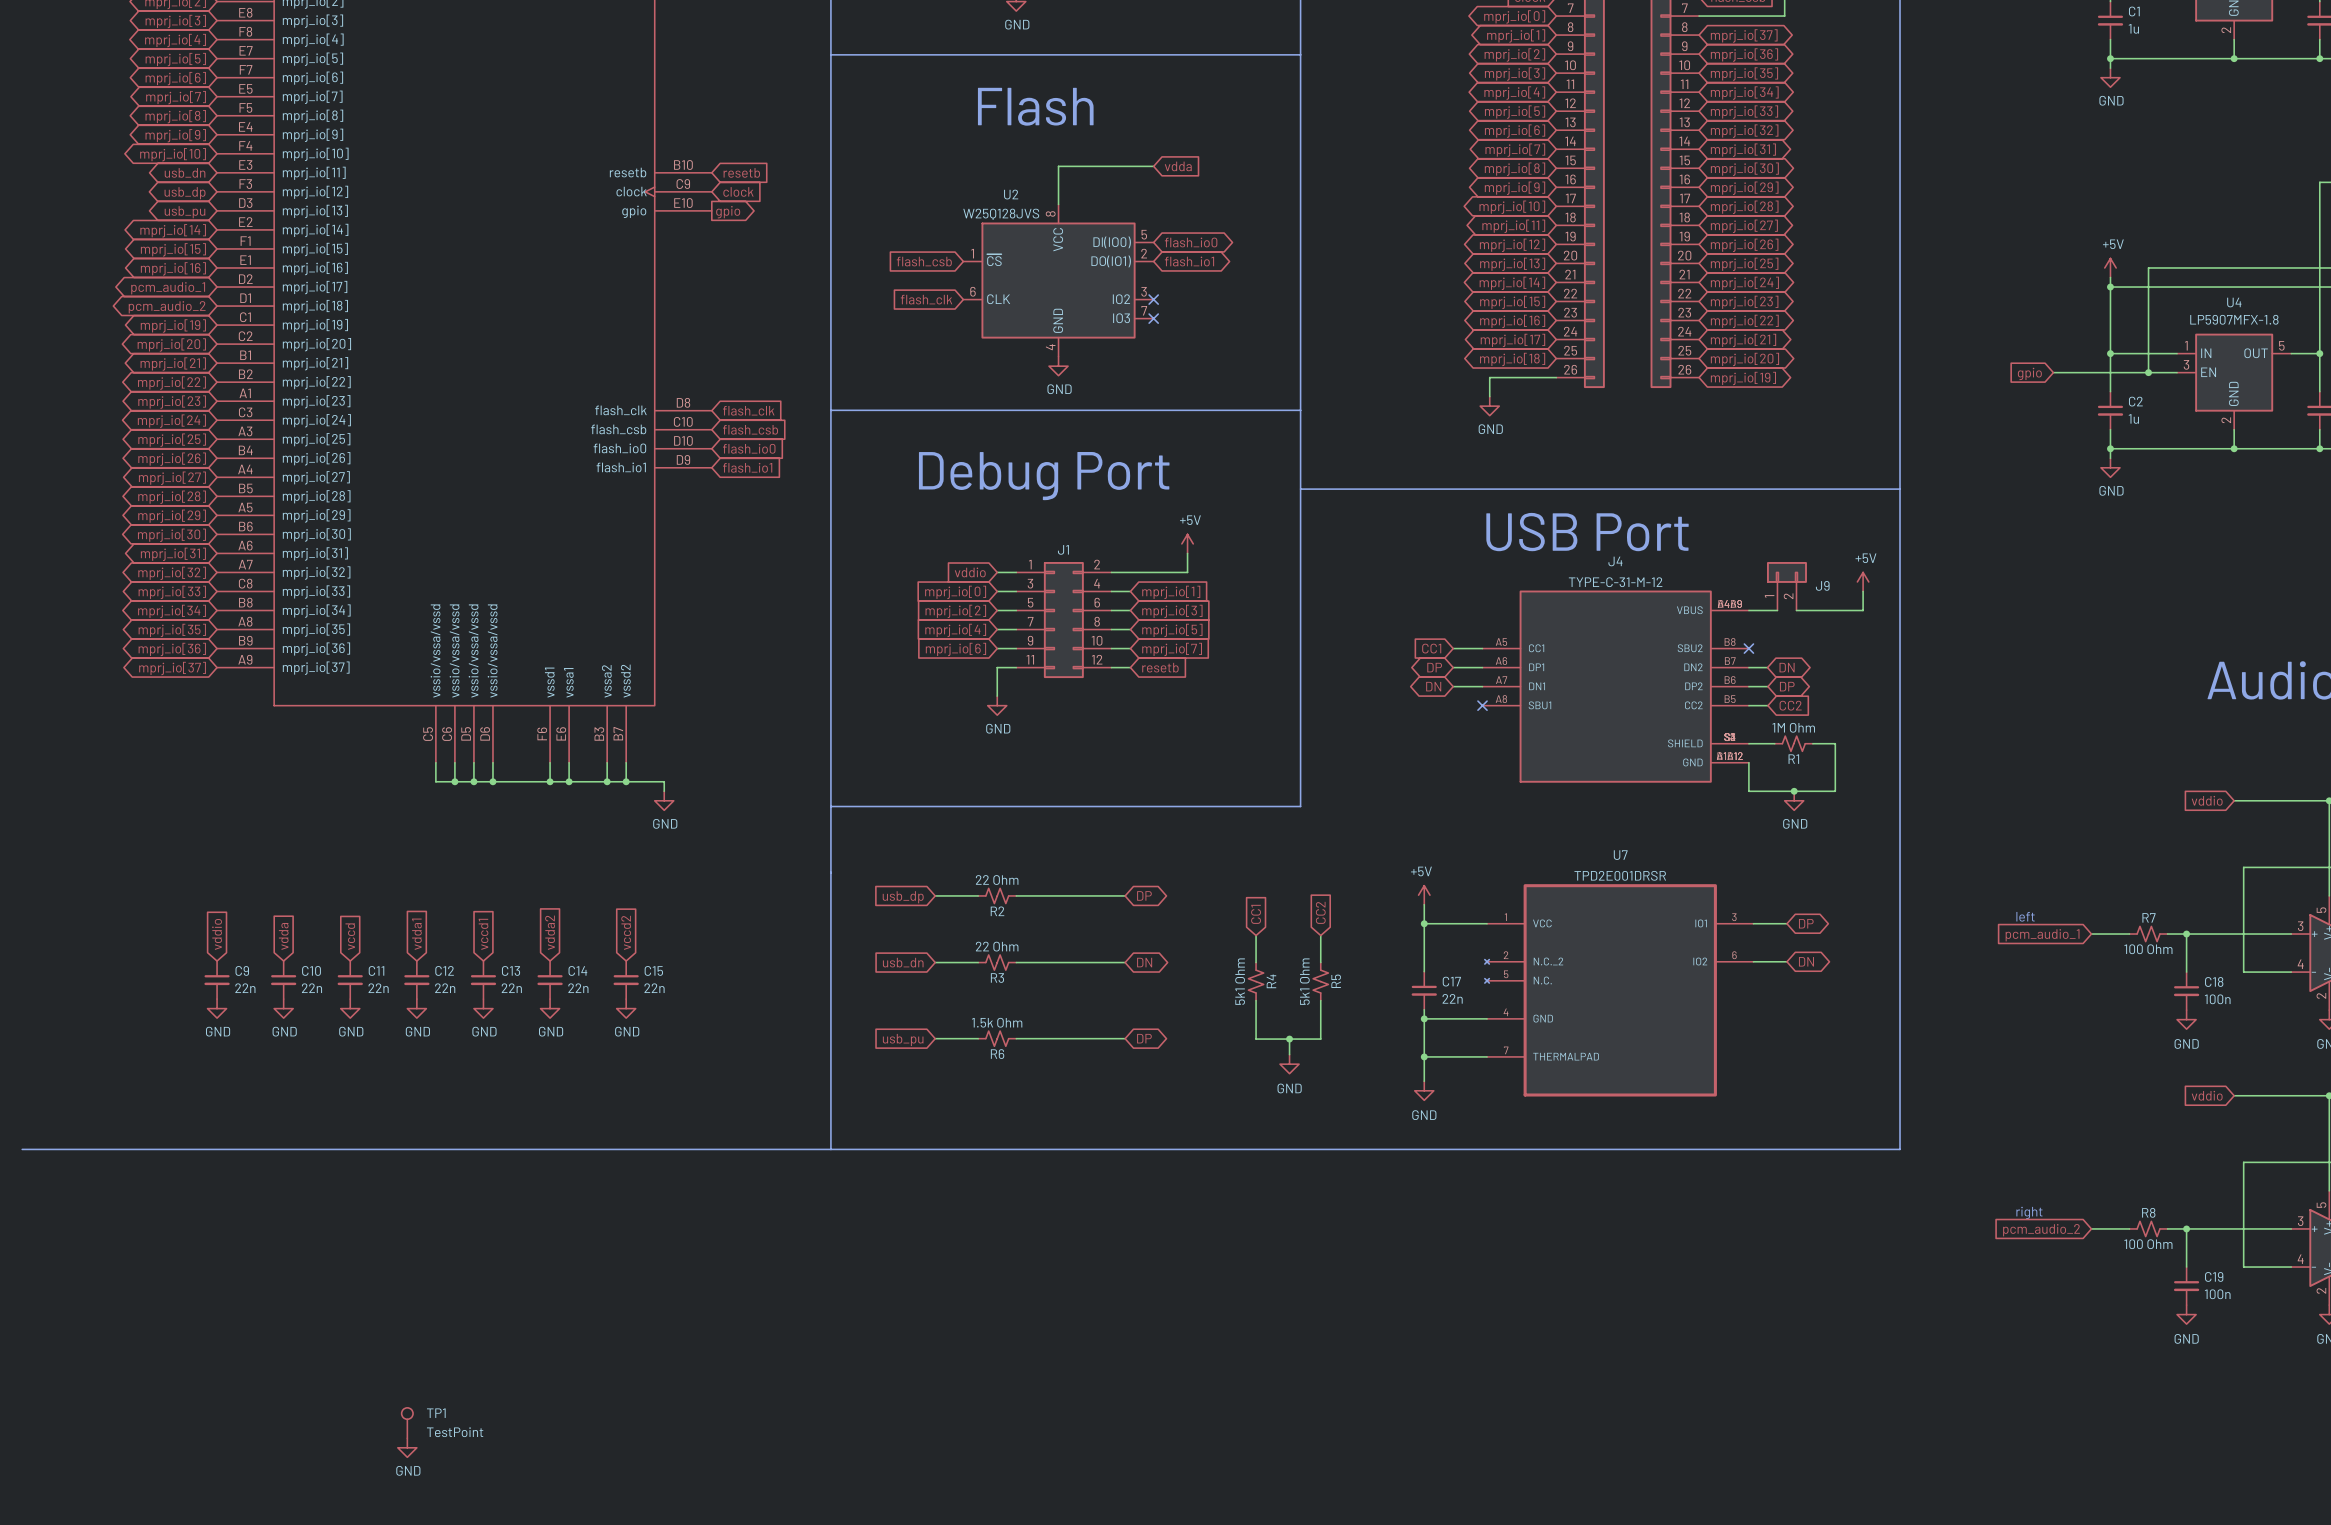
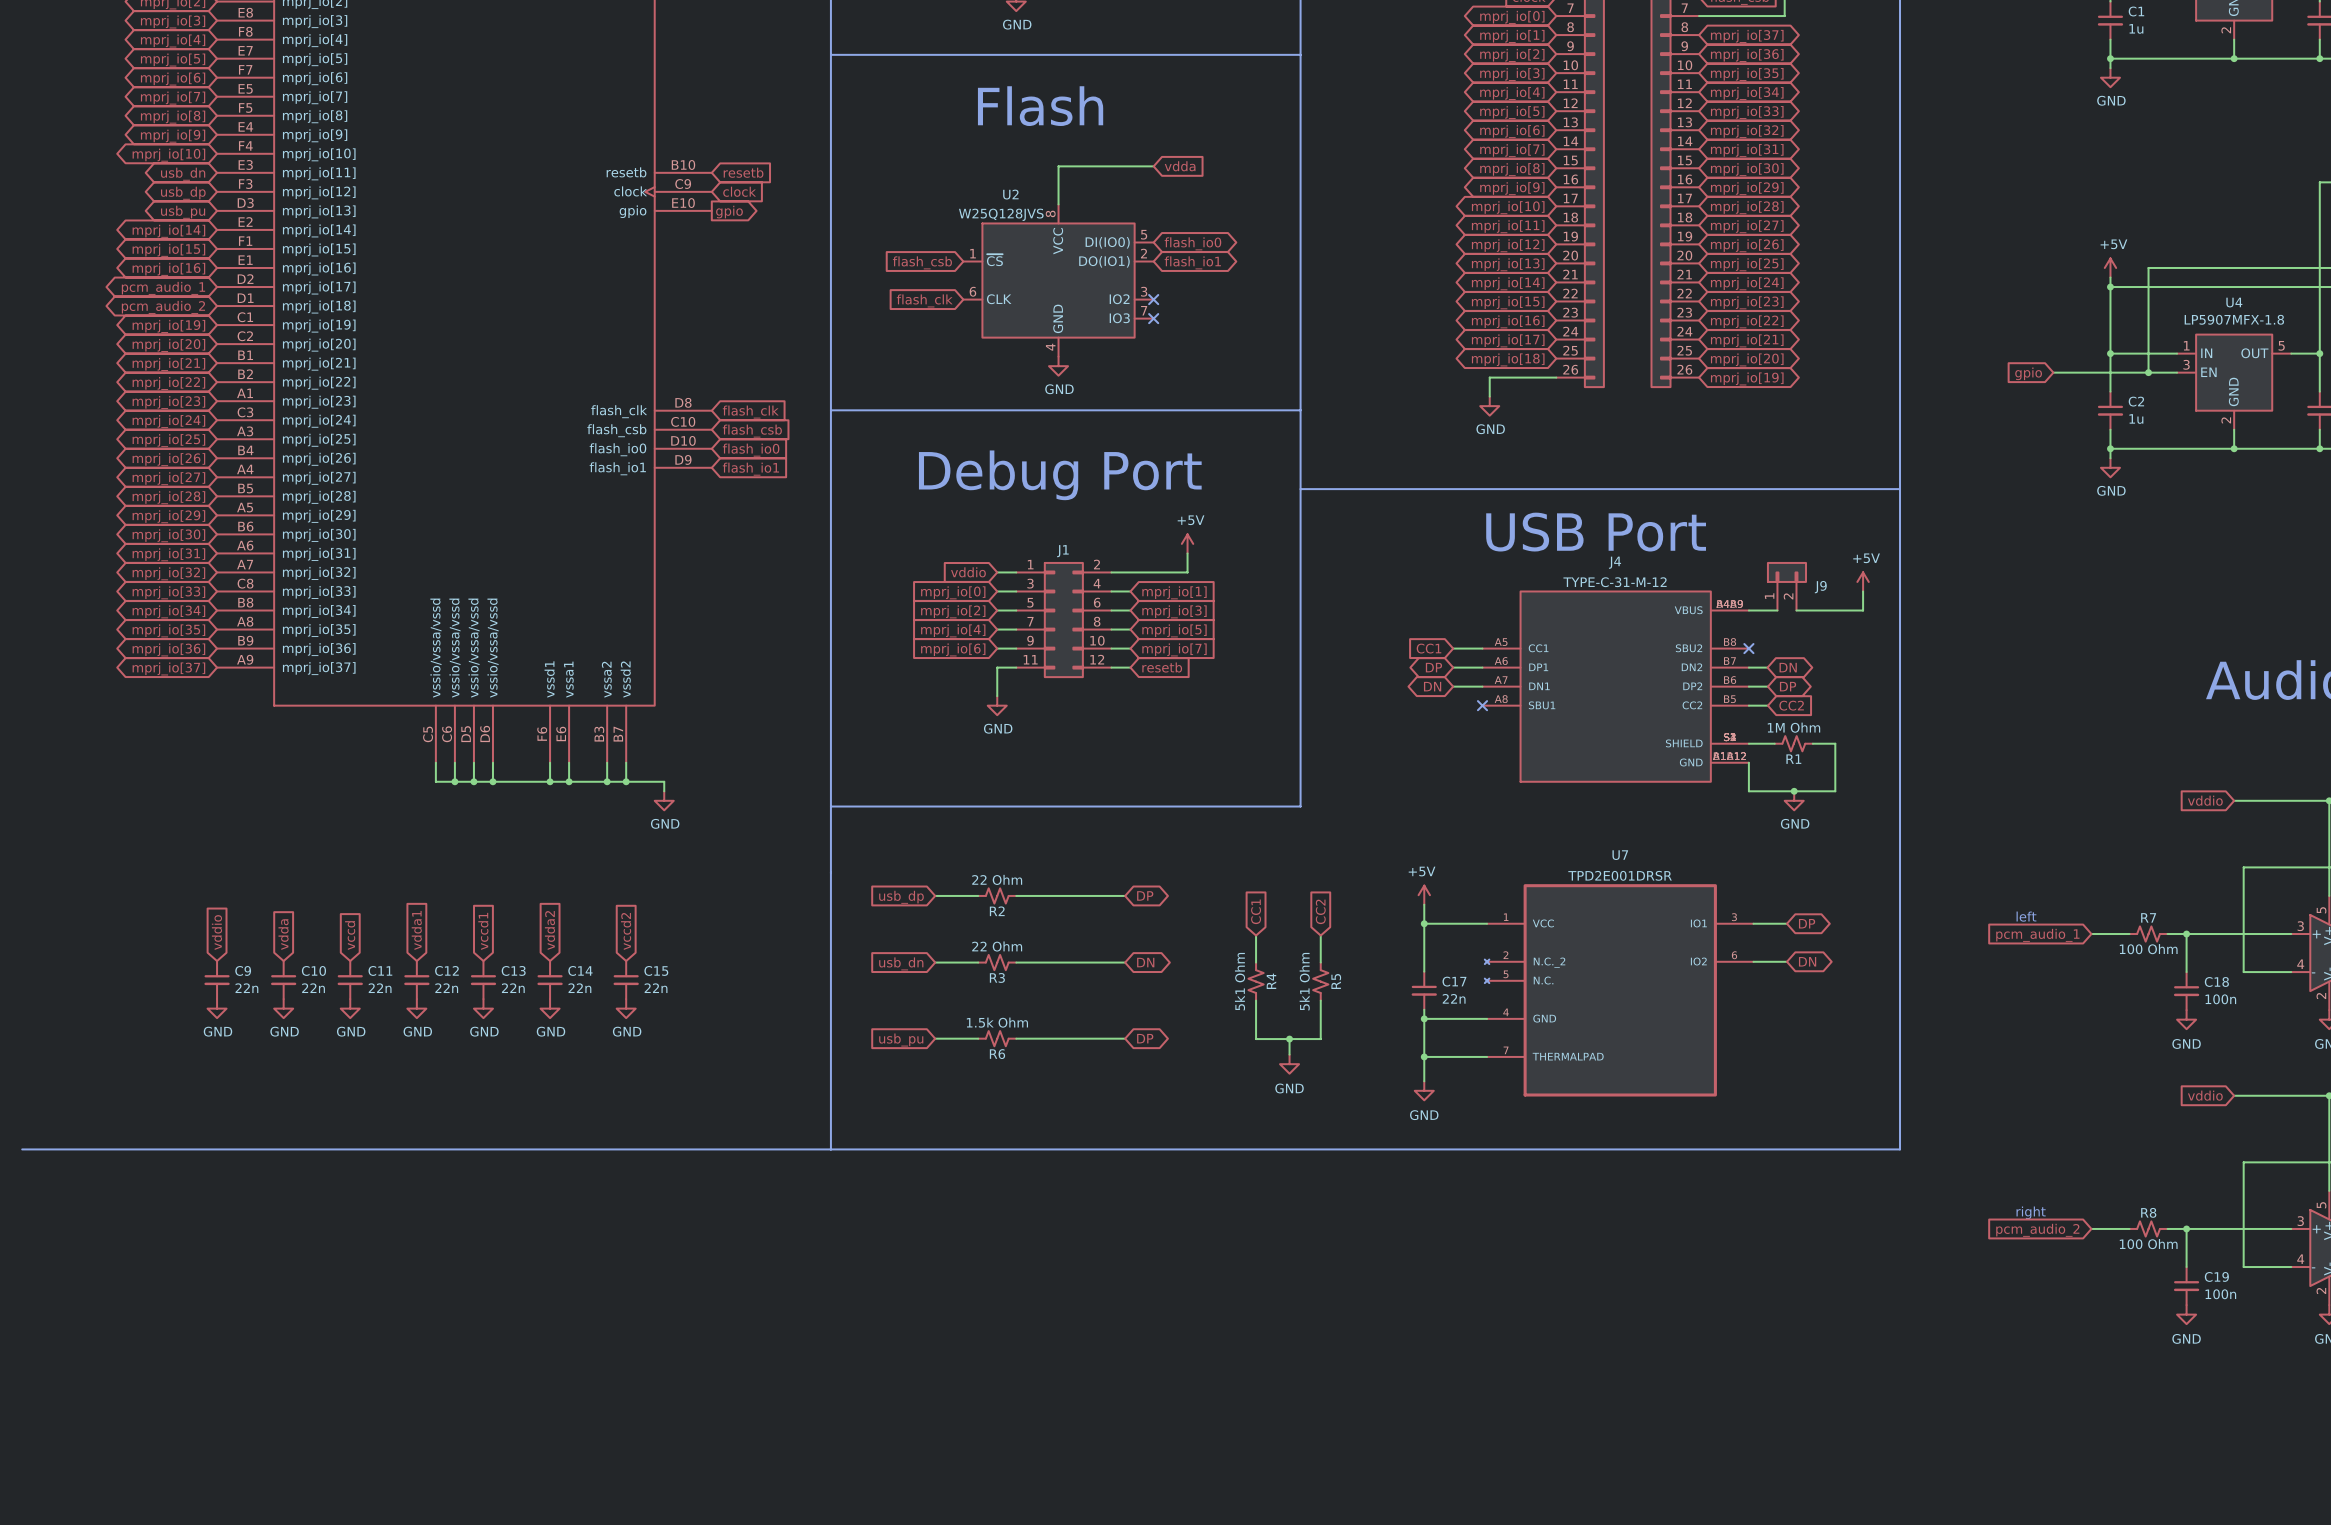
TP1: TestPoint (407, 1423) -> none
power symbol: GND (407, 1447) -> none

